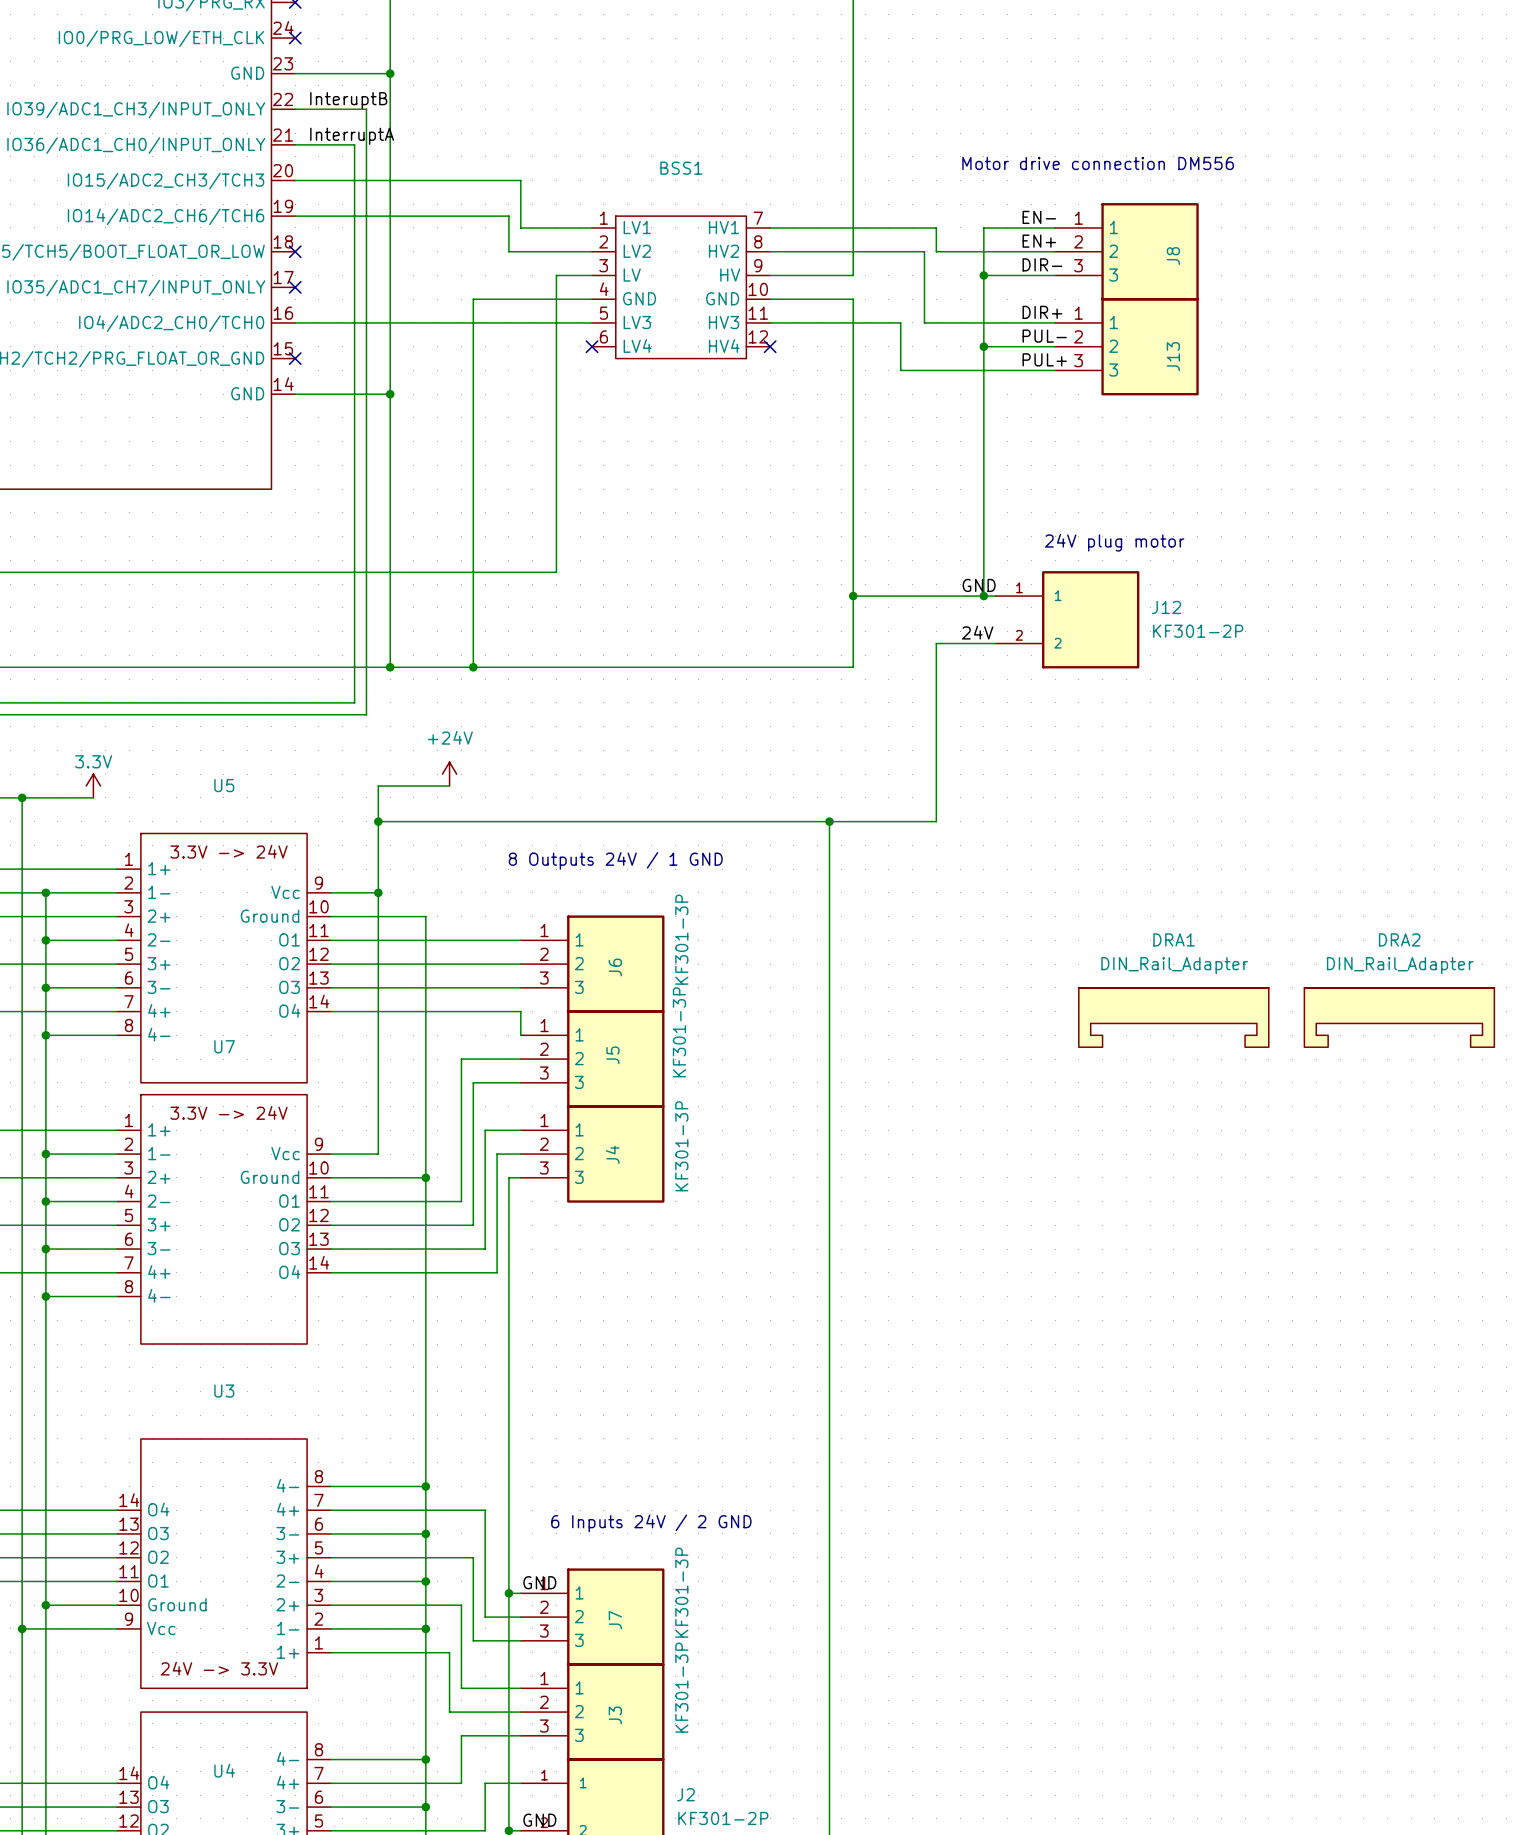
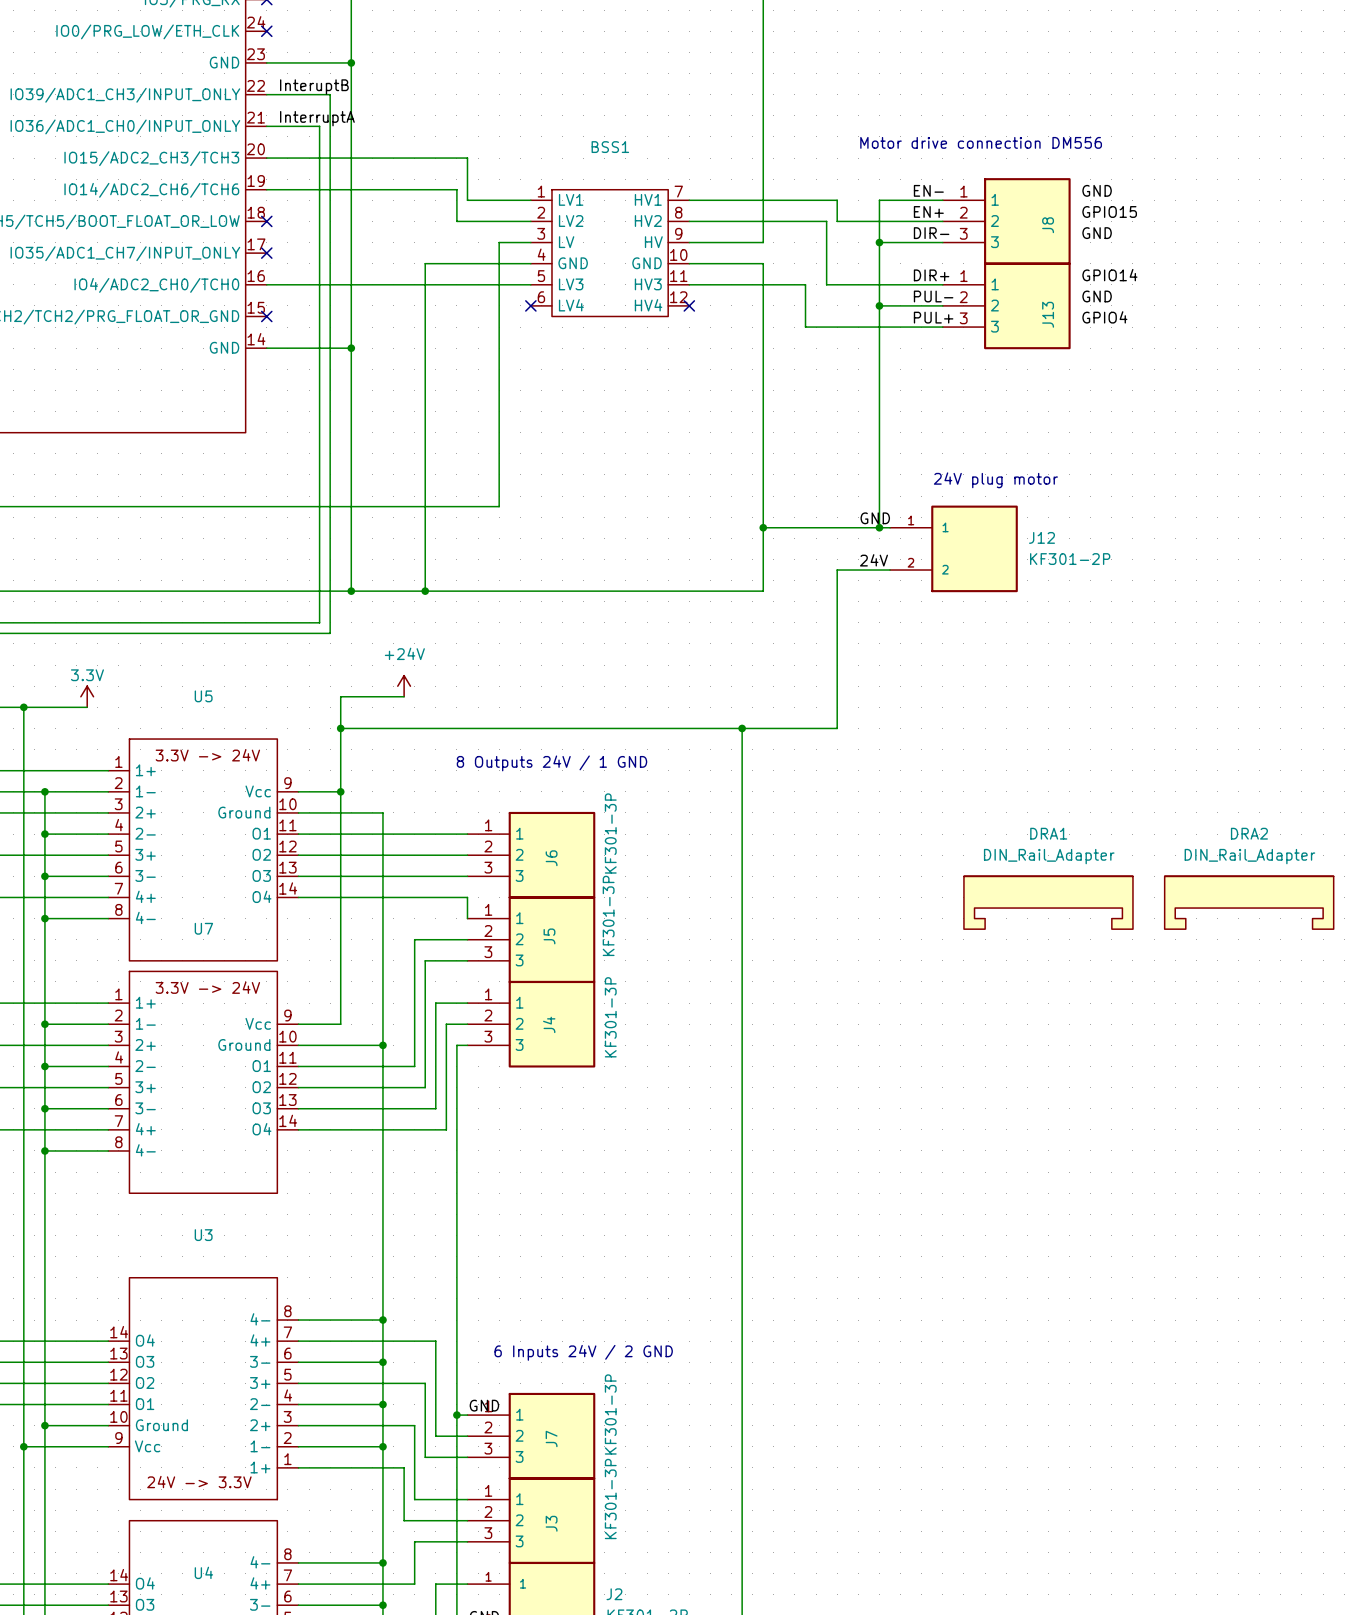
label: none -> GND (1097, 190)
label: none -> GPIO15 (1109, 211)
label: none -> GND (1097, 233)
label: none -> GPIO14 (1109, 275)
label: none -> GND (1097, 296)
label: none -> GPIO4 (1104, 317)

